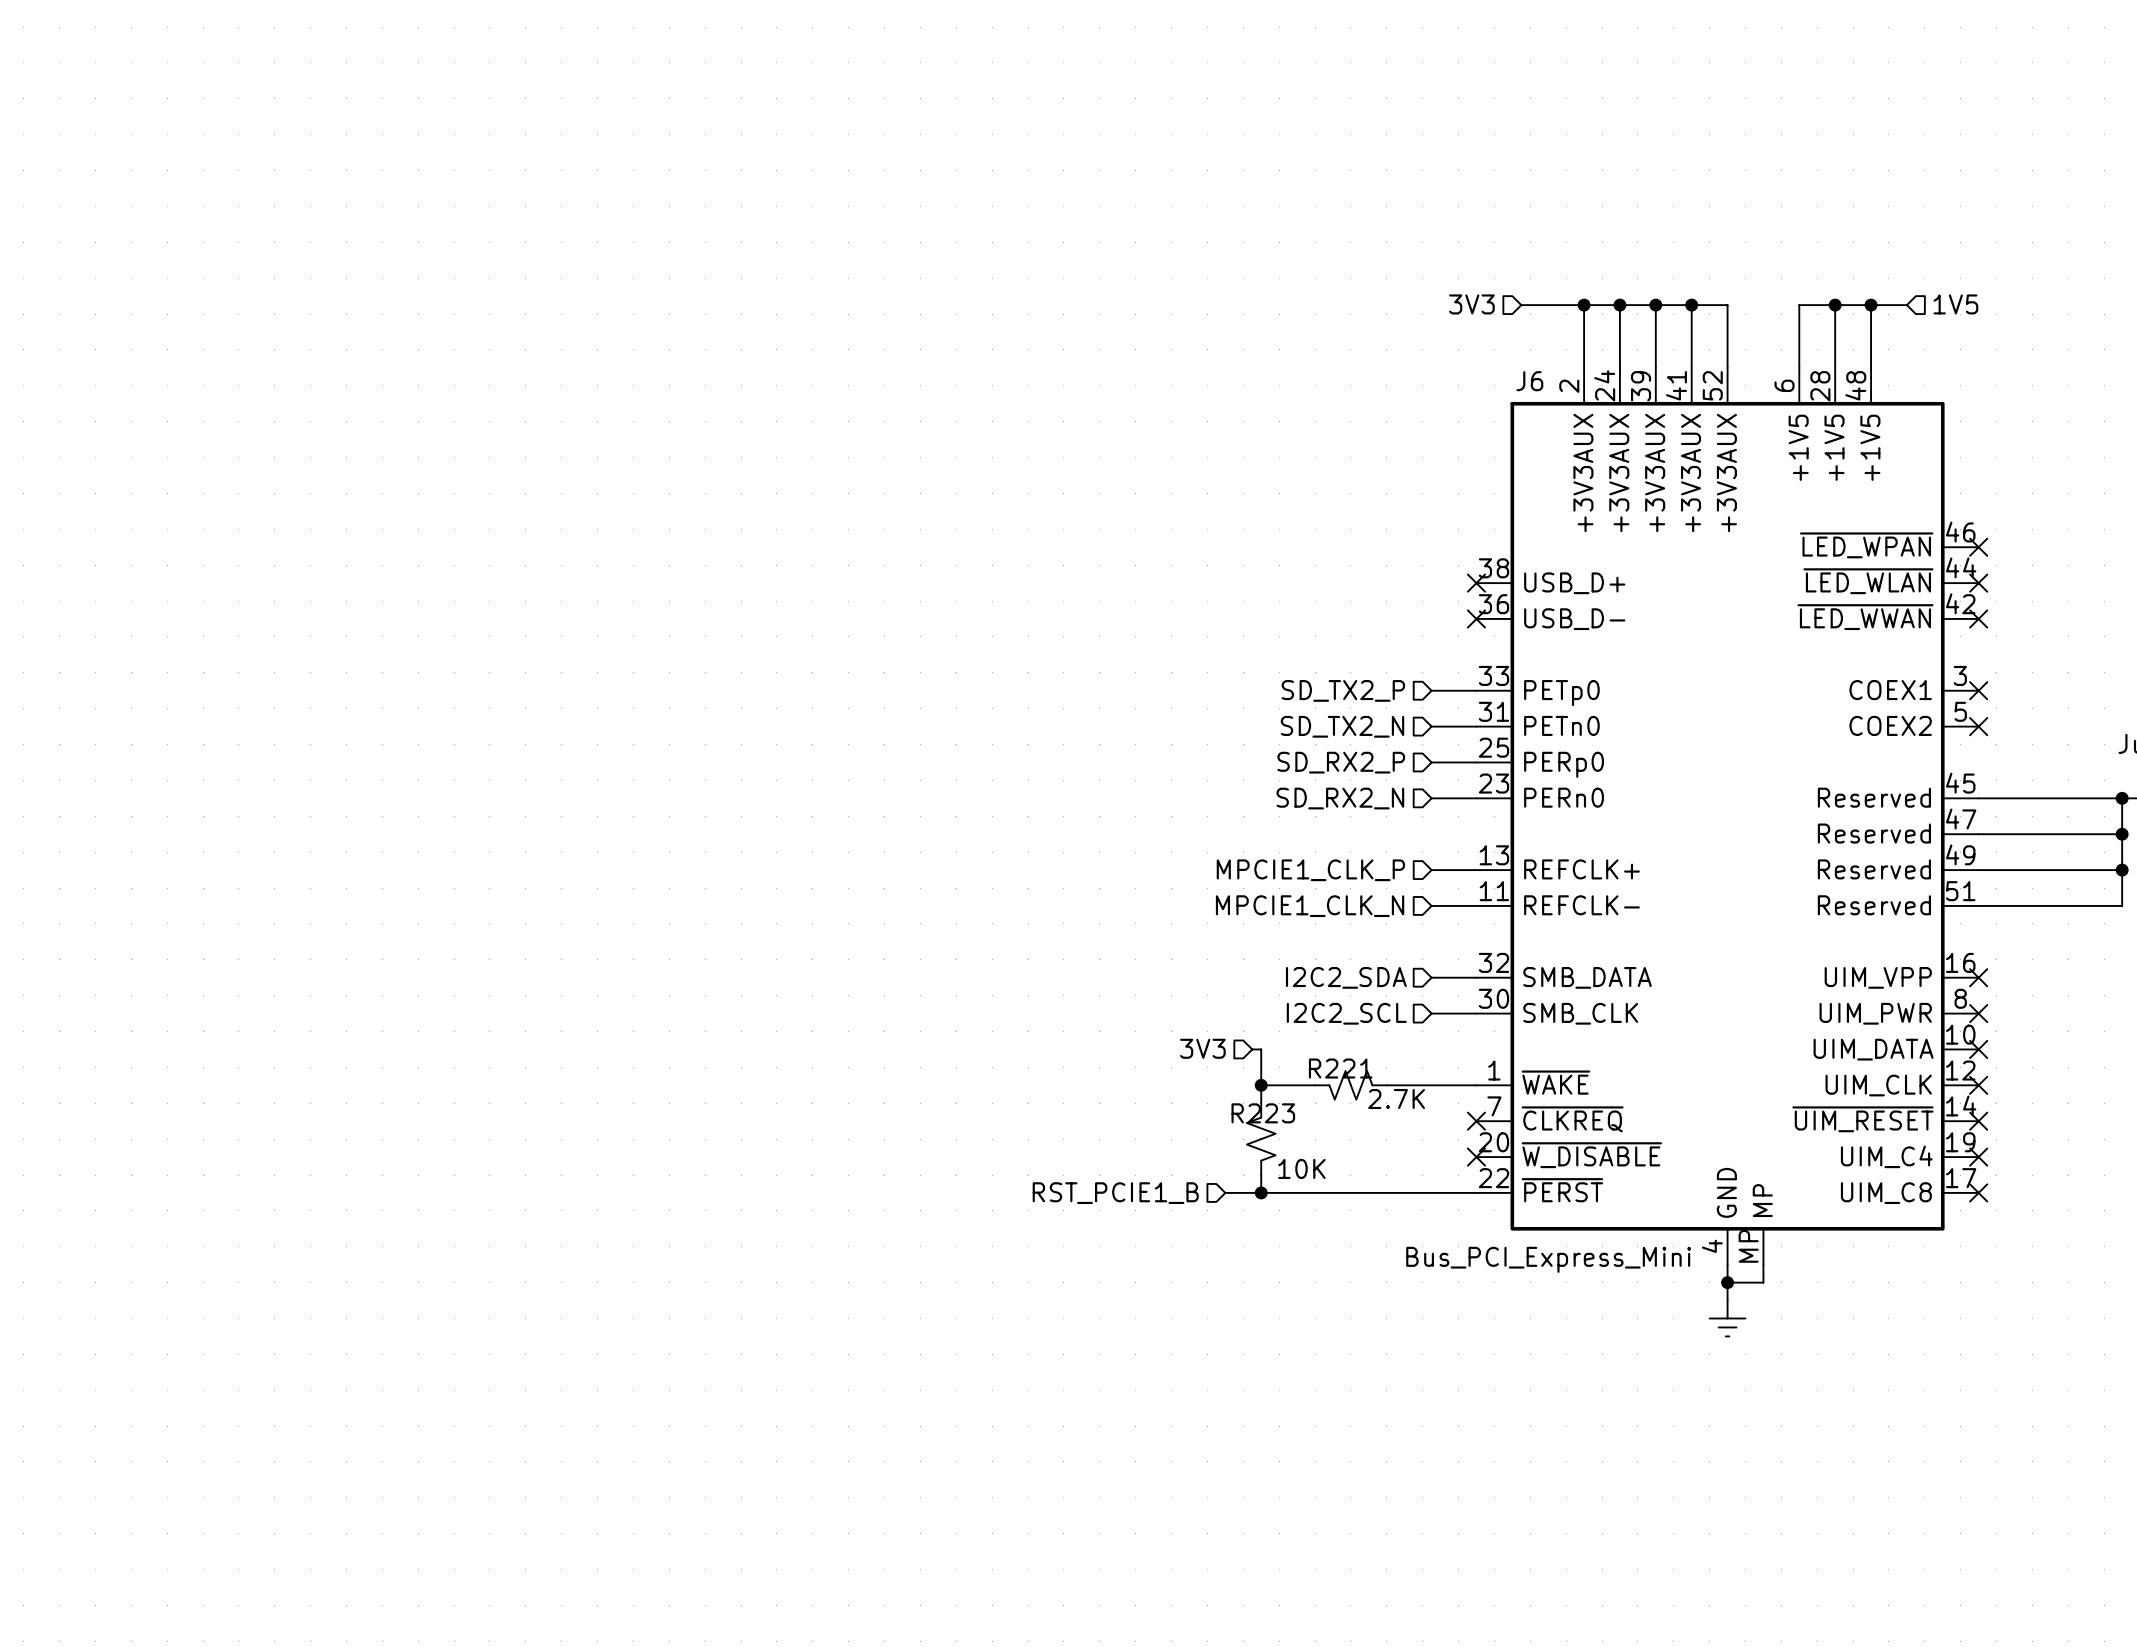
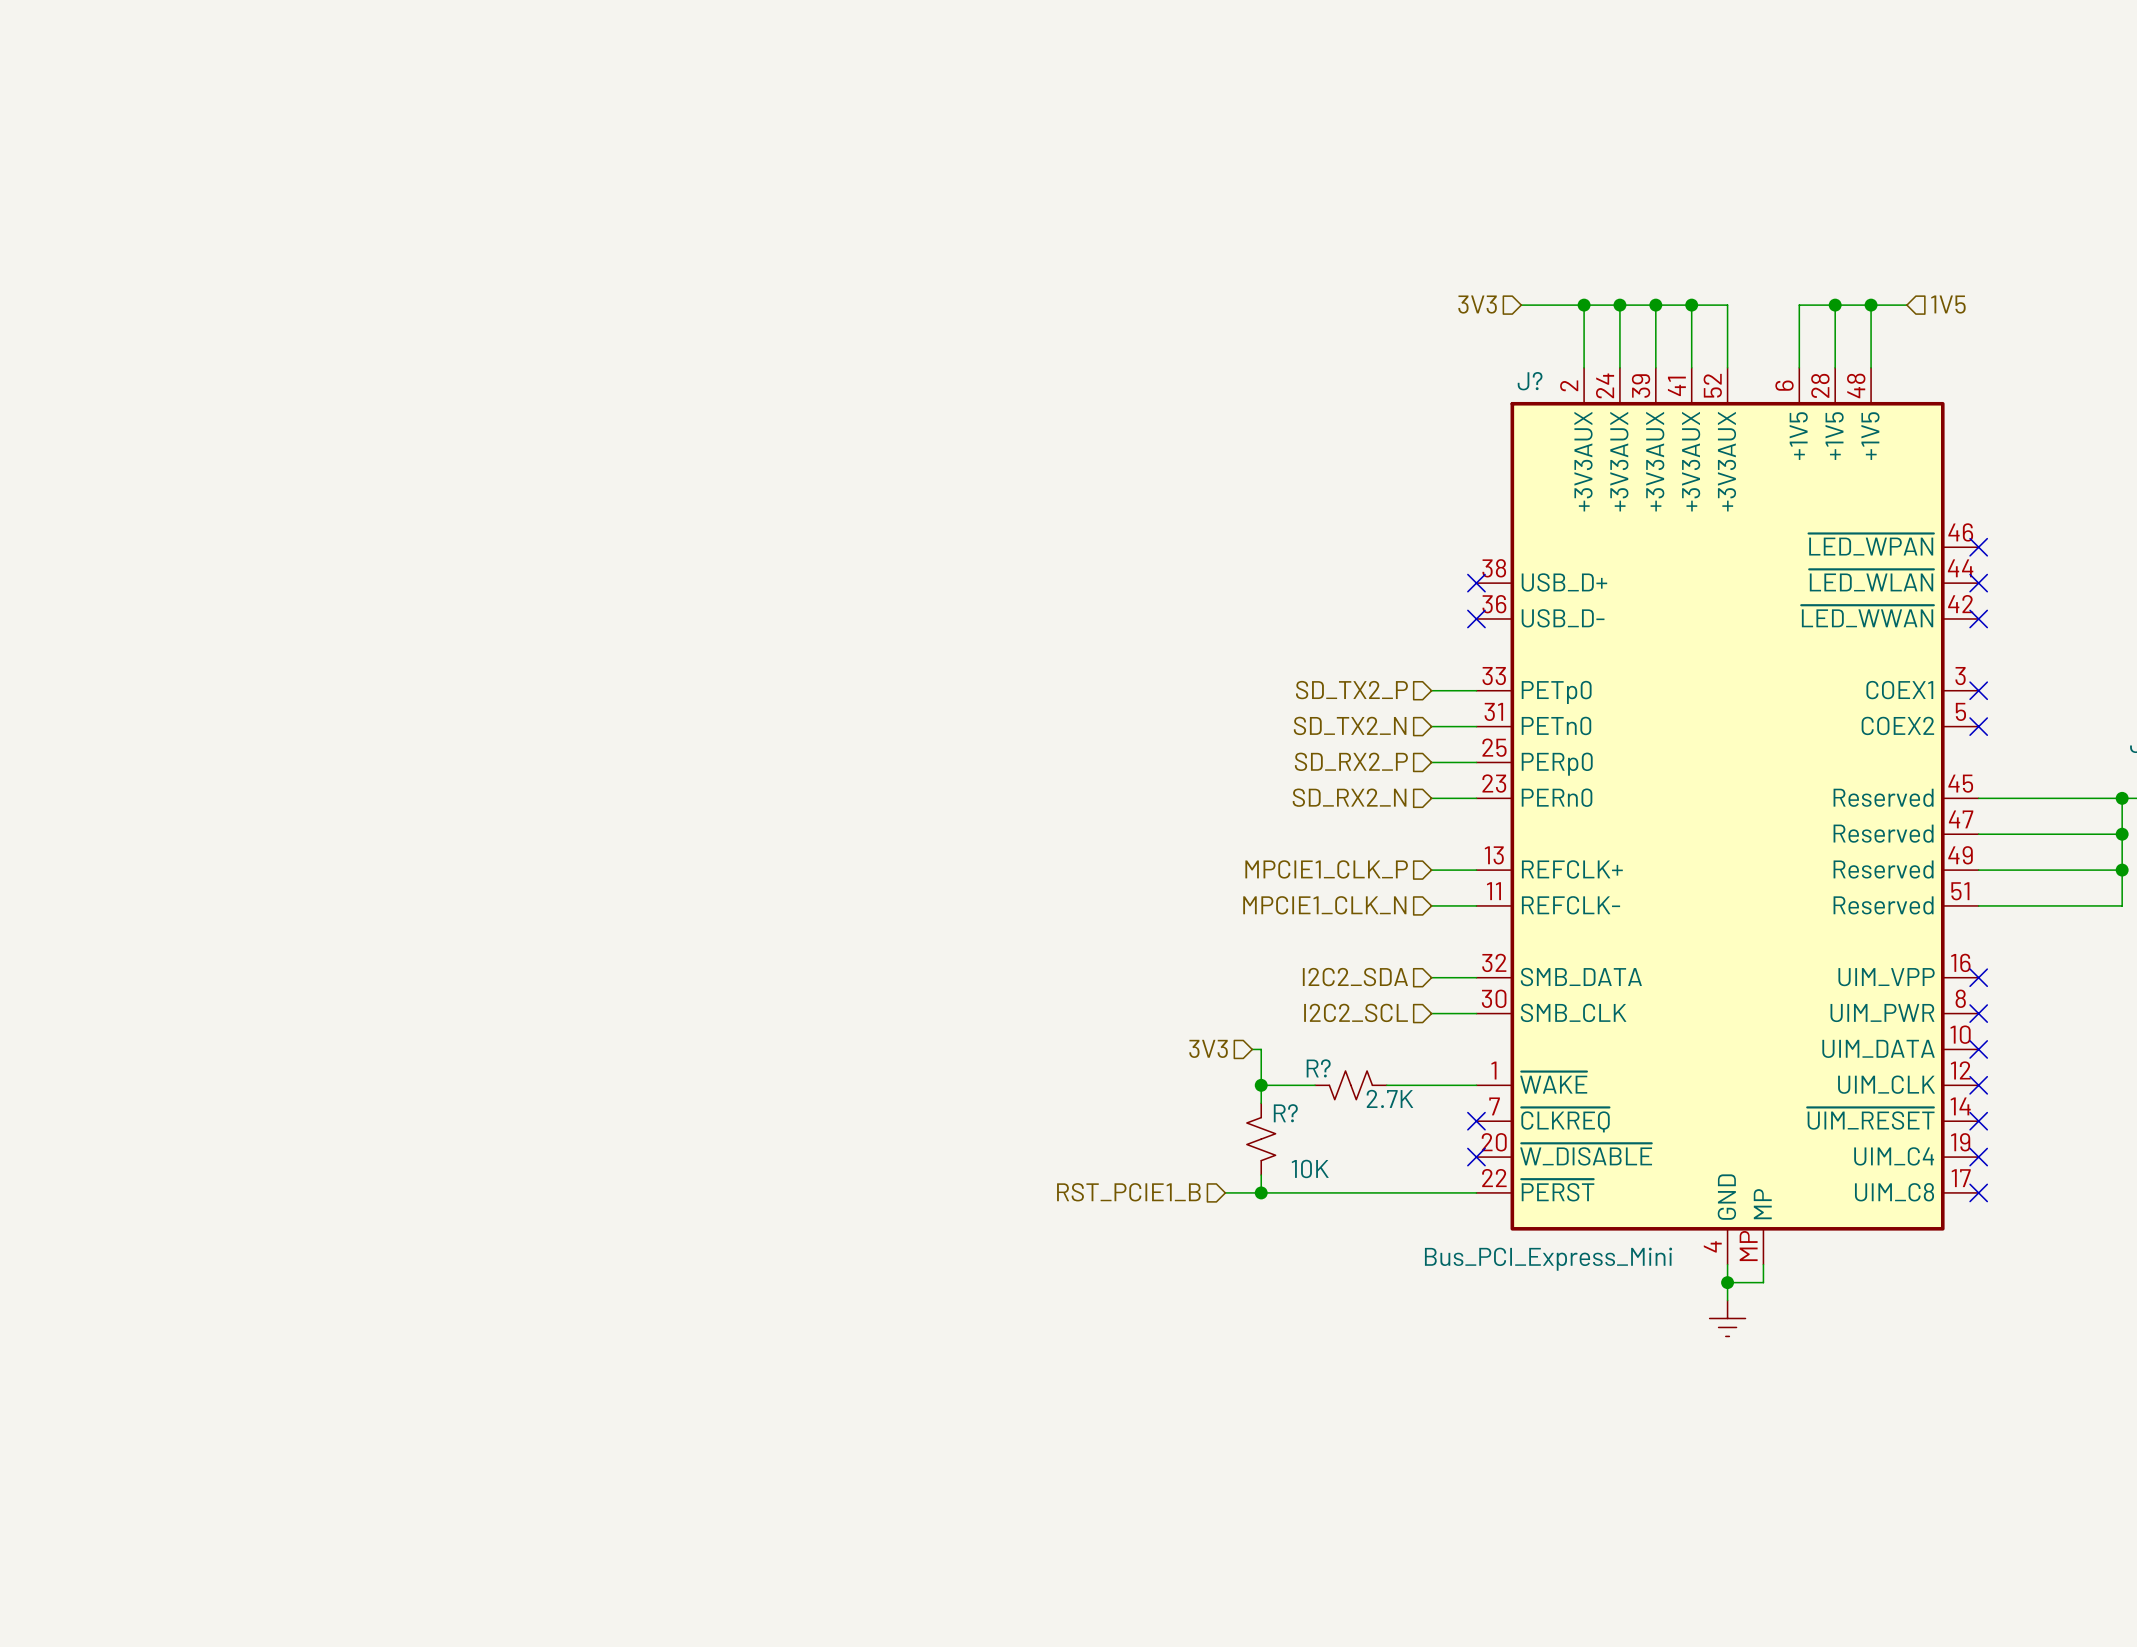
J6 name: J6 (1529, 381) -> J? (1530, 381)
R221 name: R221 (1340, 1068) -> R? (1318, 1068)
R223 name: R223 (1263, 1113) -> R? (1285, 1113)

